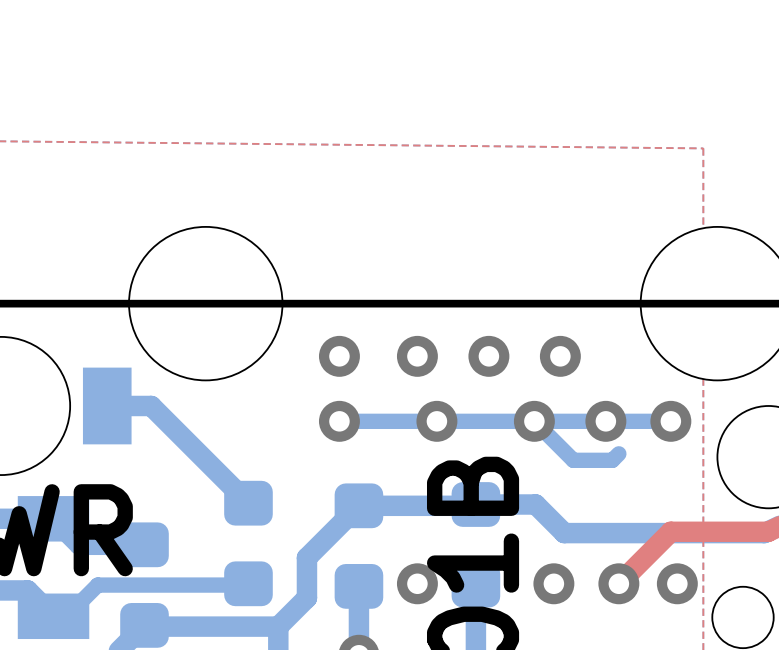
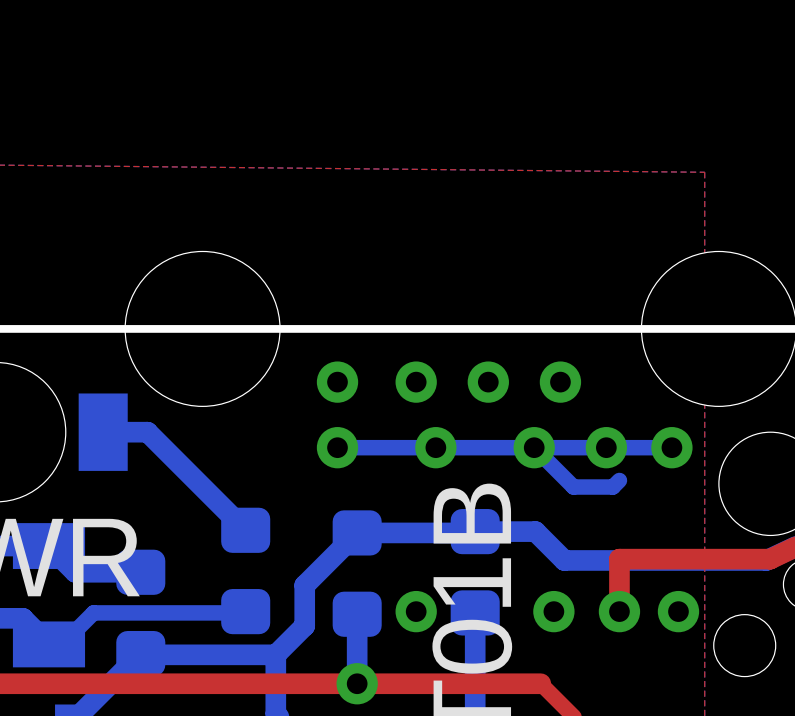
top track: (670, 531) (618, 583) -> (671, 559) (619, 559) (619, 611)

